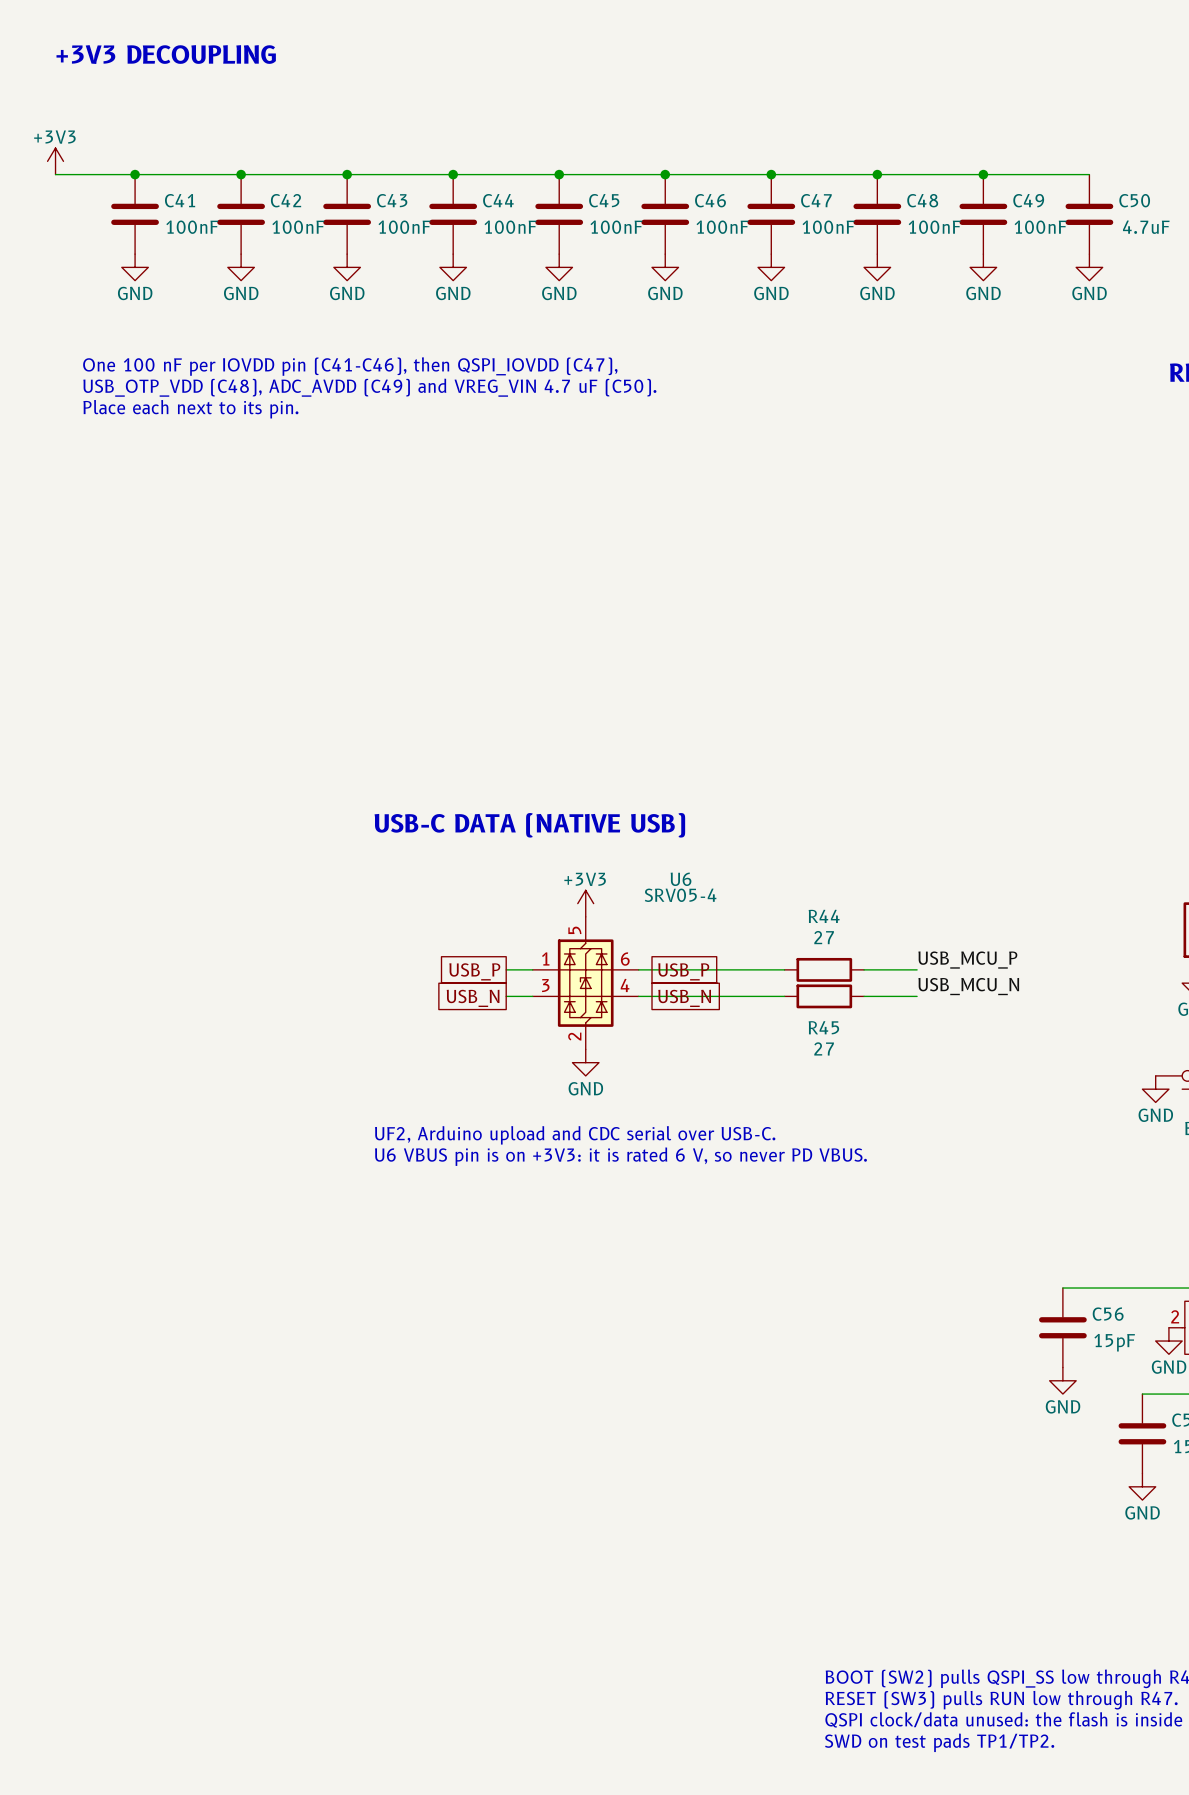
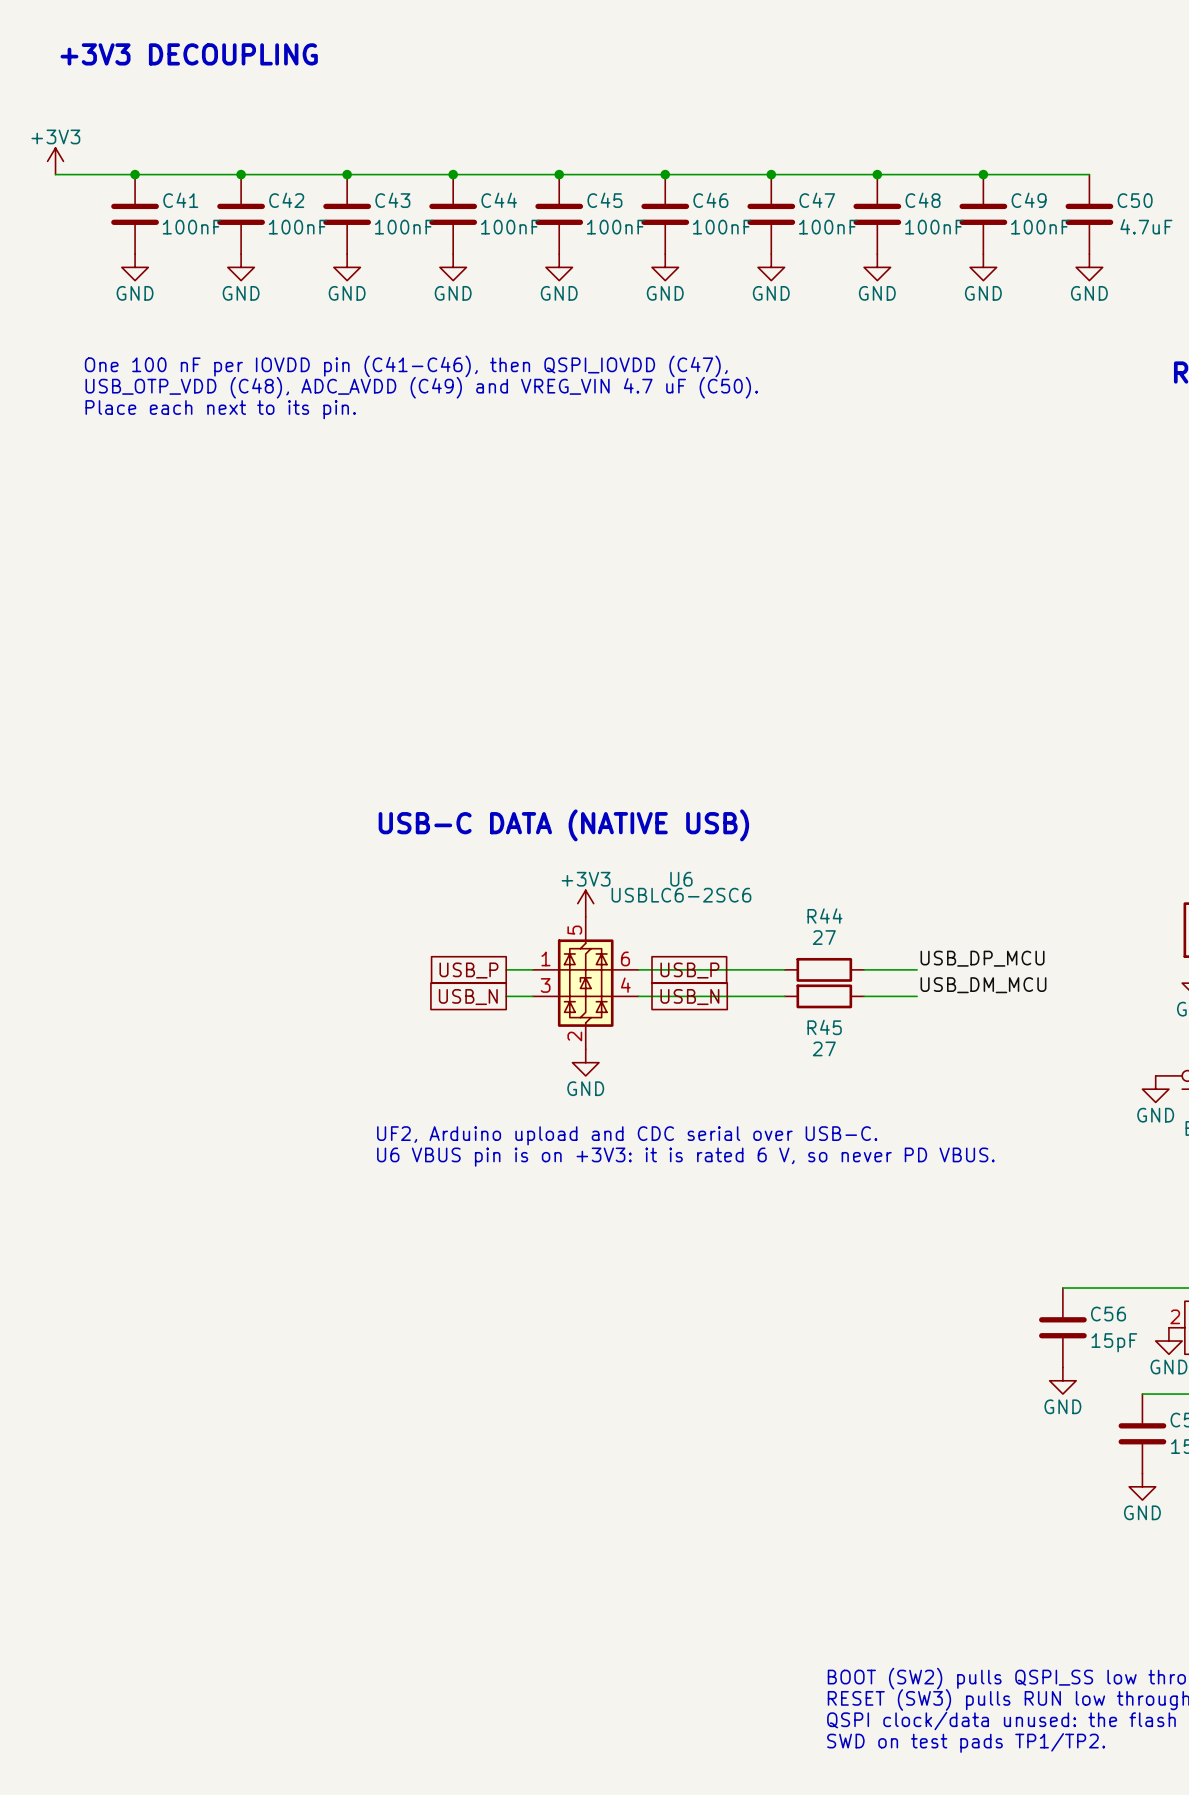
U6 value: SRV05-4 (680, 895) -> USBLC6-2SC6 (681, 895)
label: USB_MCU_P (967, 960) -> USB_DP_MCU (982, 958)
label: USB_MCU_N (968, 986) -> USB_DM_MCU (983, 985)

